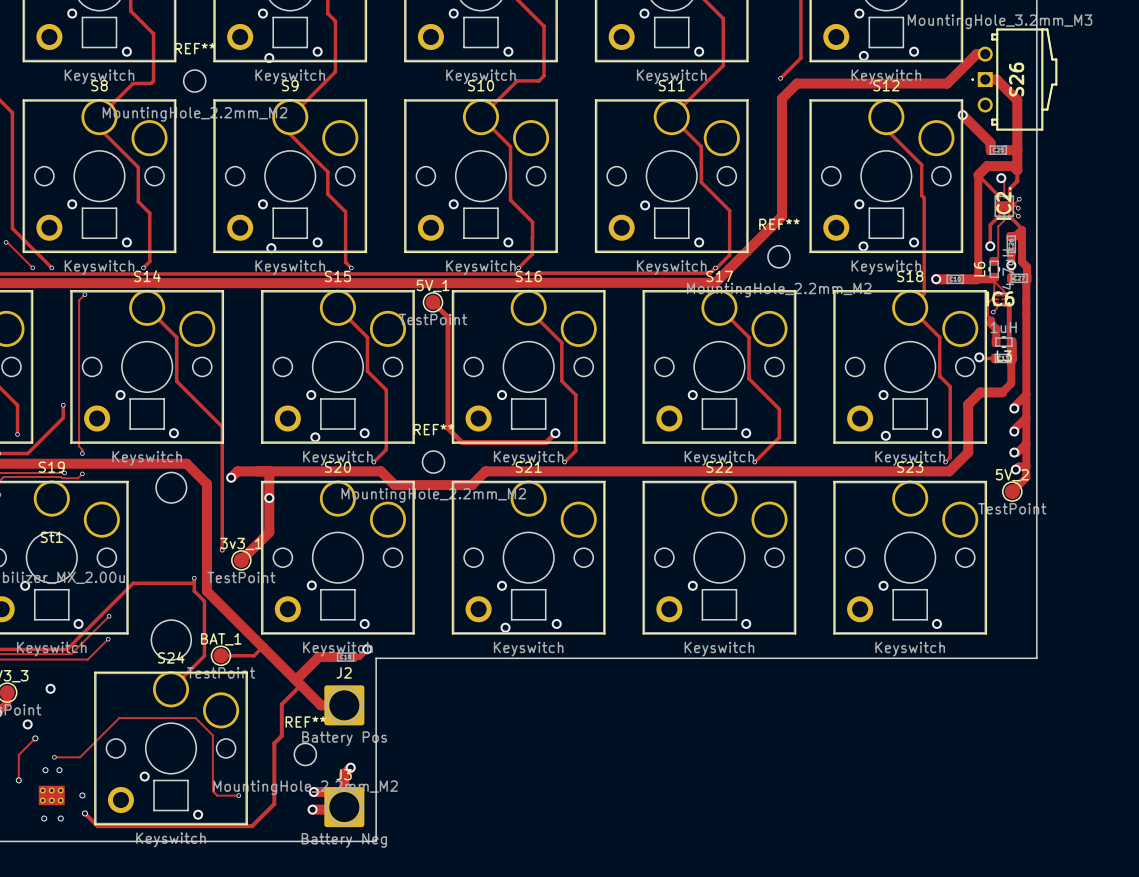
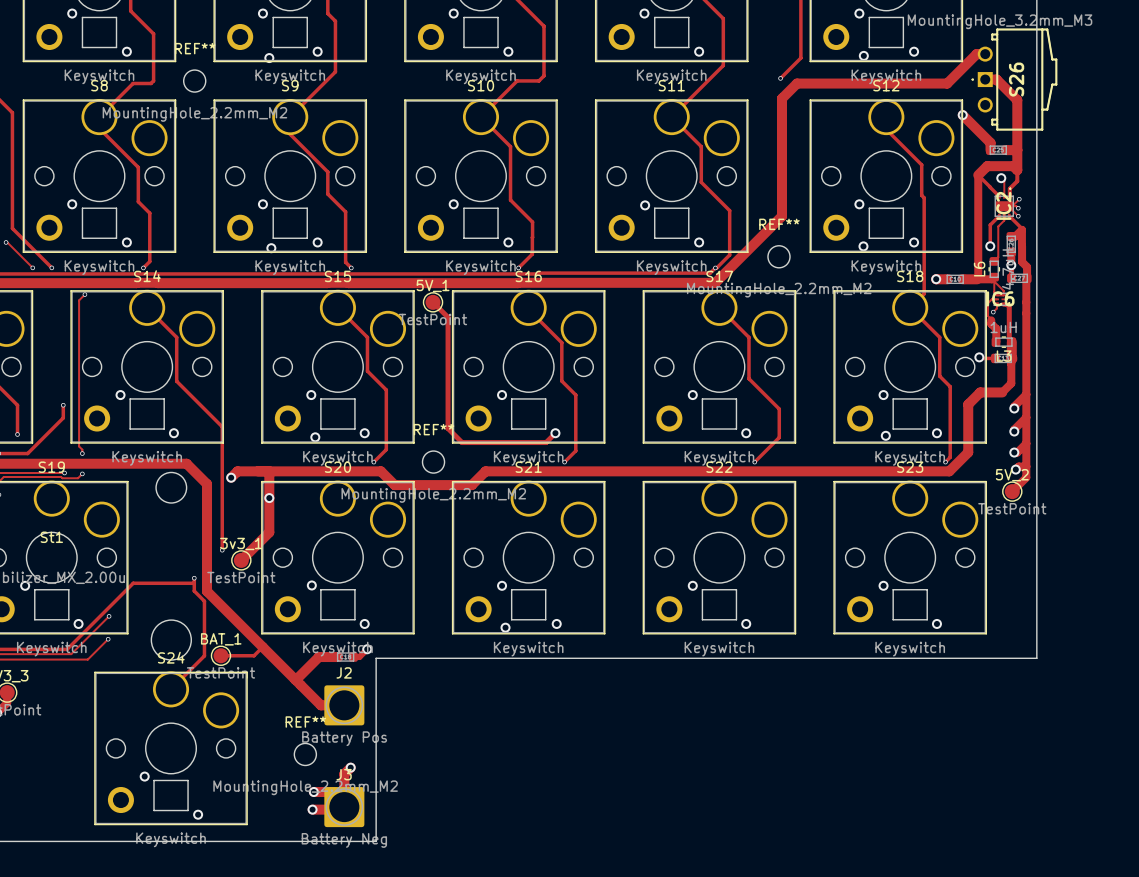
track: (300, 685) (281, 704) (281, 735) (274, 743) (274, 804) (252, 826) (97, 826) (84, 813) -> none
via: (50, 688) -> none
via: (27, 724) -> none
track: (35, 738) (18, 754) (18, 780) -> none
via: (35, 738) -> none
track: (54, 757) (80, 757) (119, 718) (195, 718) (212, 735) (212, 791) (217, 795) (238, 795) -> none
via: (54, 757) -> none
via: (45, 770) -> none
via: (59, 770) -> none
via: (18, 780) -> none
part: (51, 795) -> none
via: (82, 795) -> none
via: (238, 795) -> none
via: (84, 813) -> none
via: (44, 818) -> none
via: (60, 818) -> none

